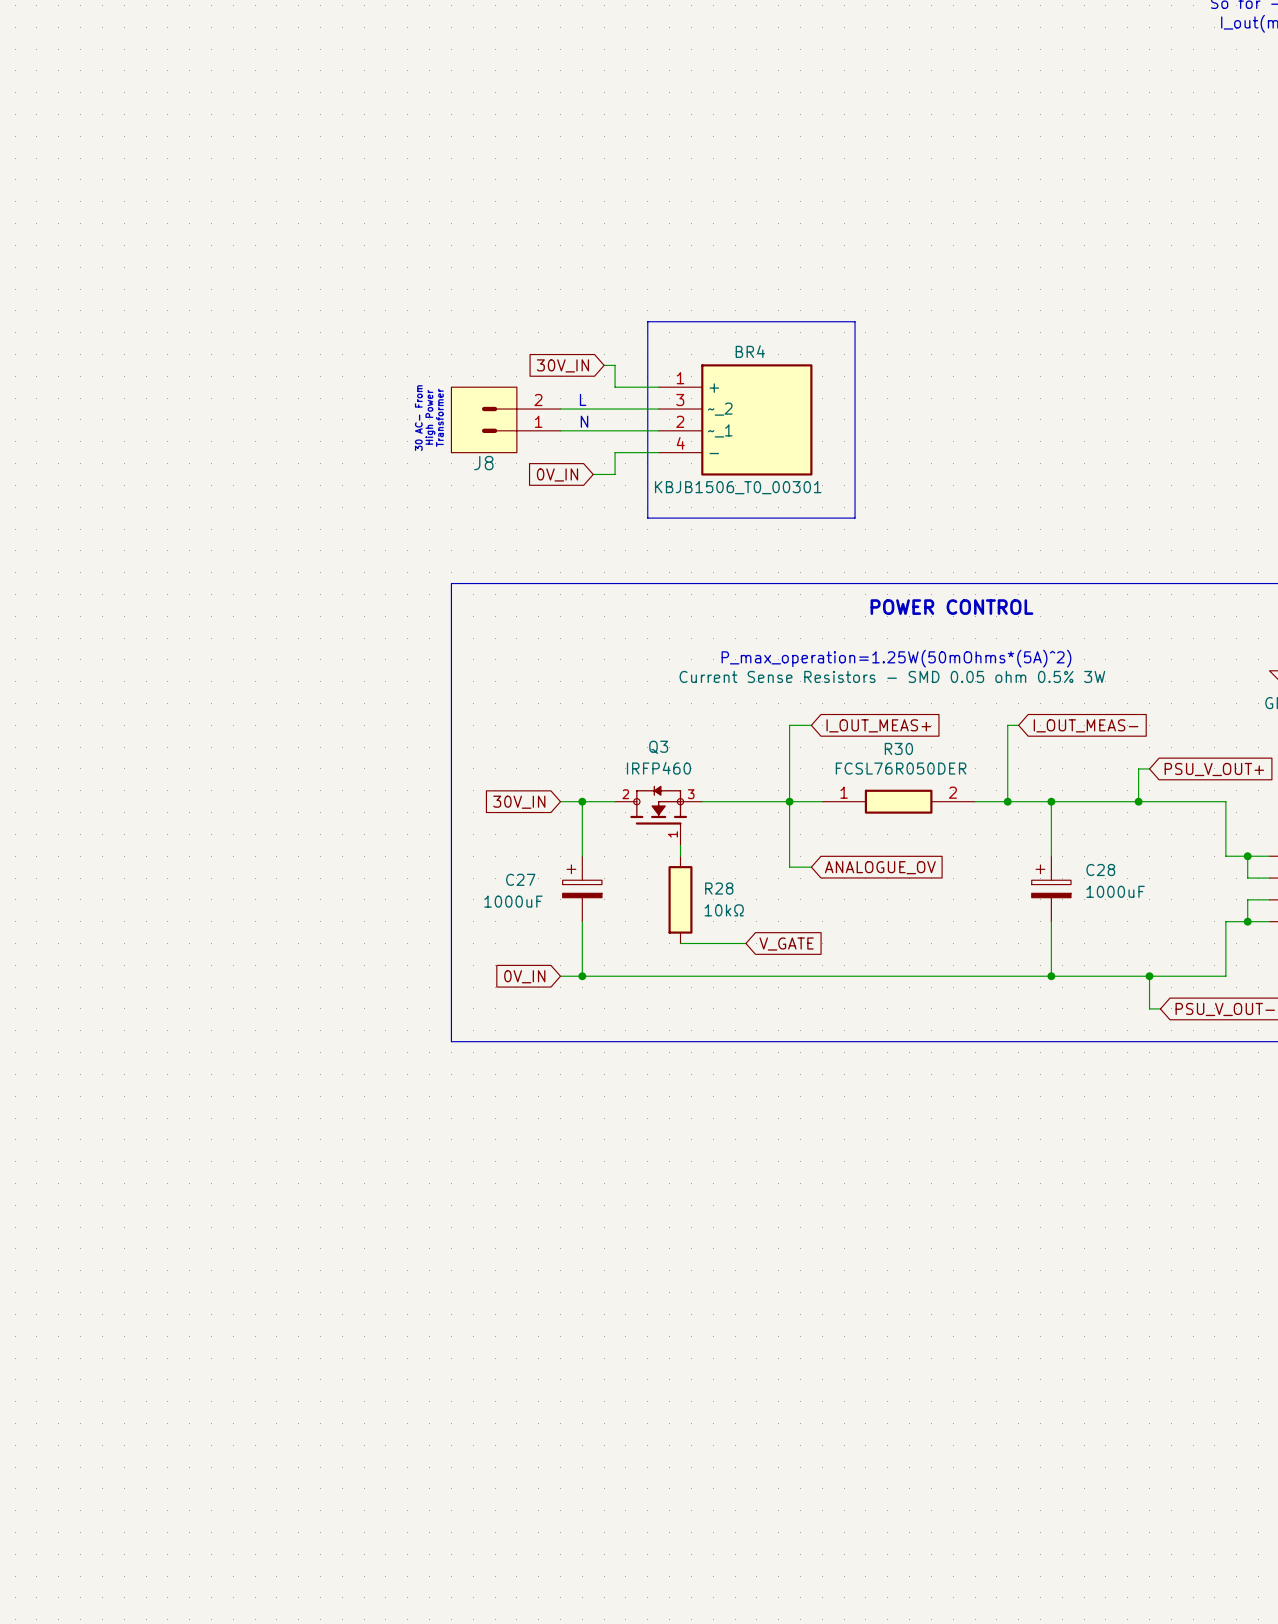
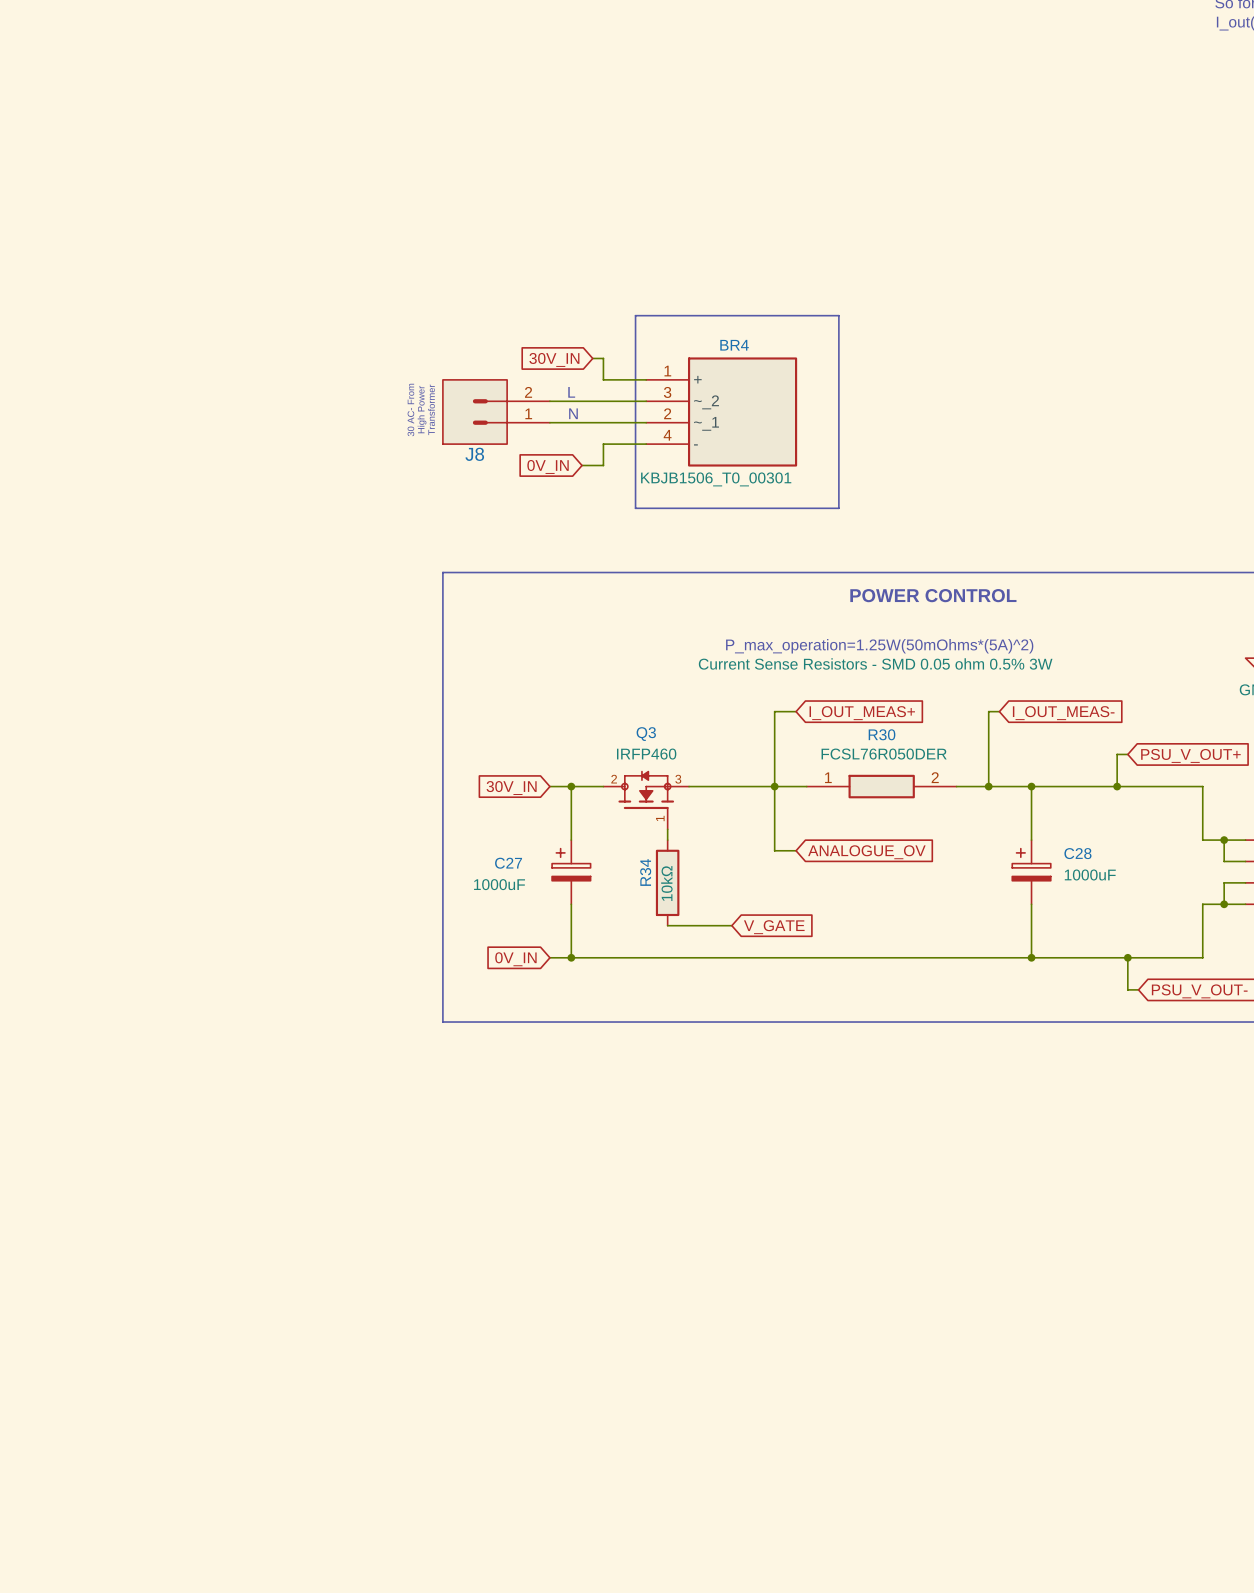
R28 name: R28 (719, 888) -> R34 (645, 872)
R28 value rotation: 0° (724, 910) -> 90° counterclockwise (666, 883)

